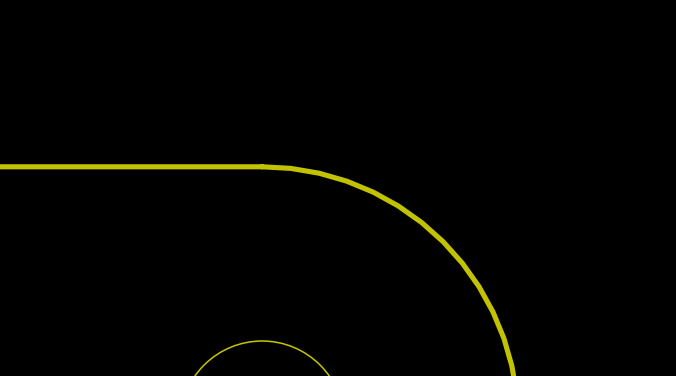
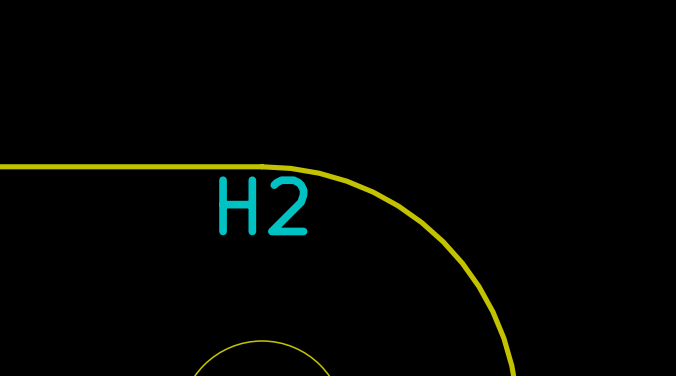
H2 name: none -> H2 (263, 205)

